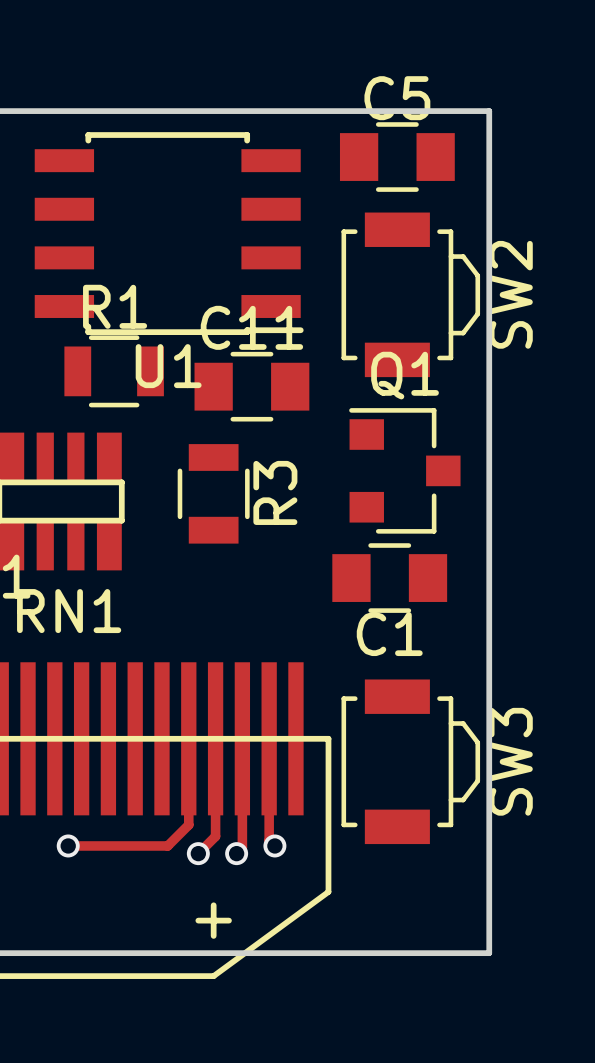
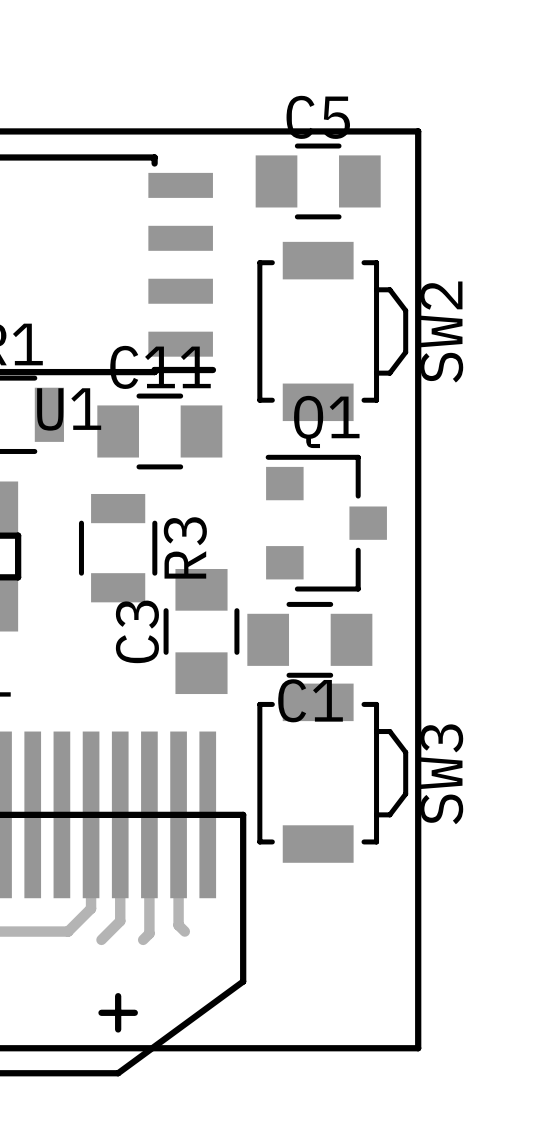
C3: none -> (201, 631)
SW3 position: (410, 761) -> (332, 773)
via: (274, 845) -> none
via: (198, 853) -> none
via: (236, 853) -> none

